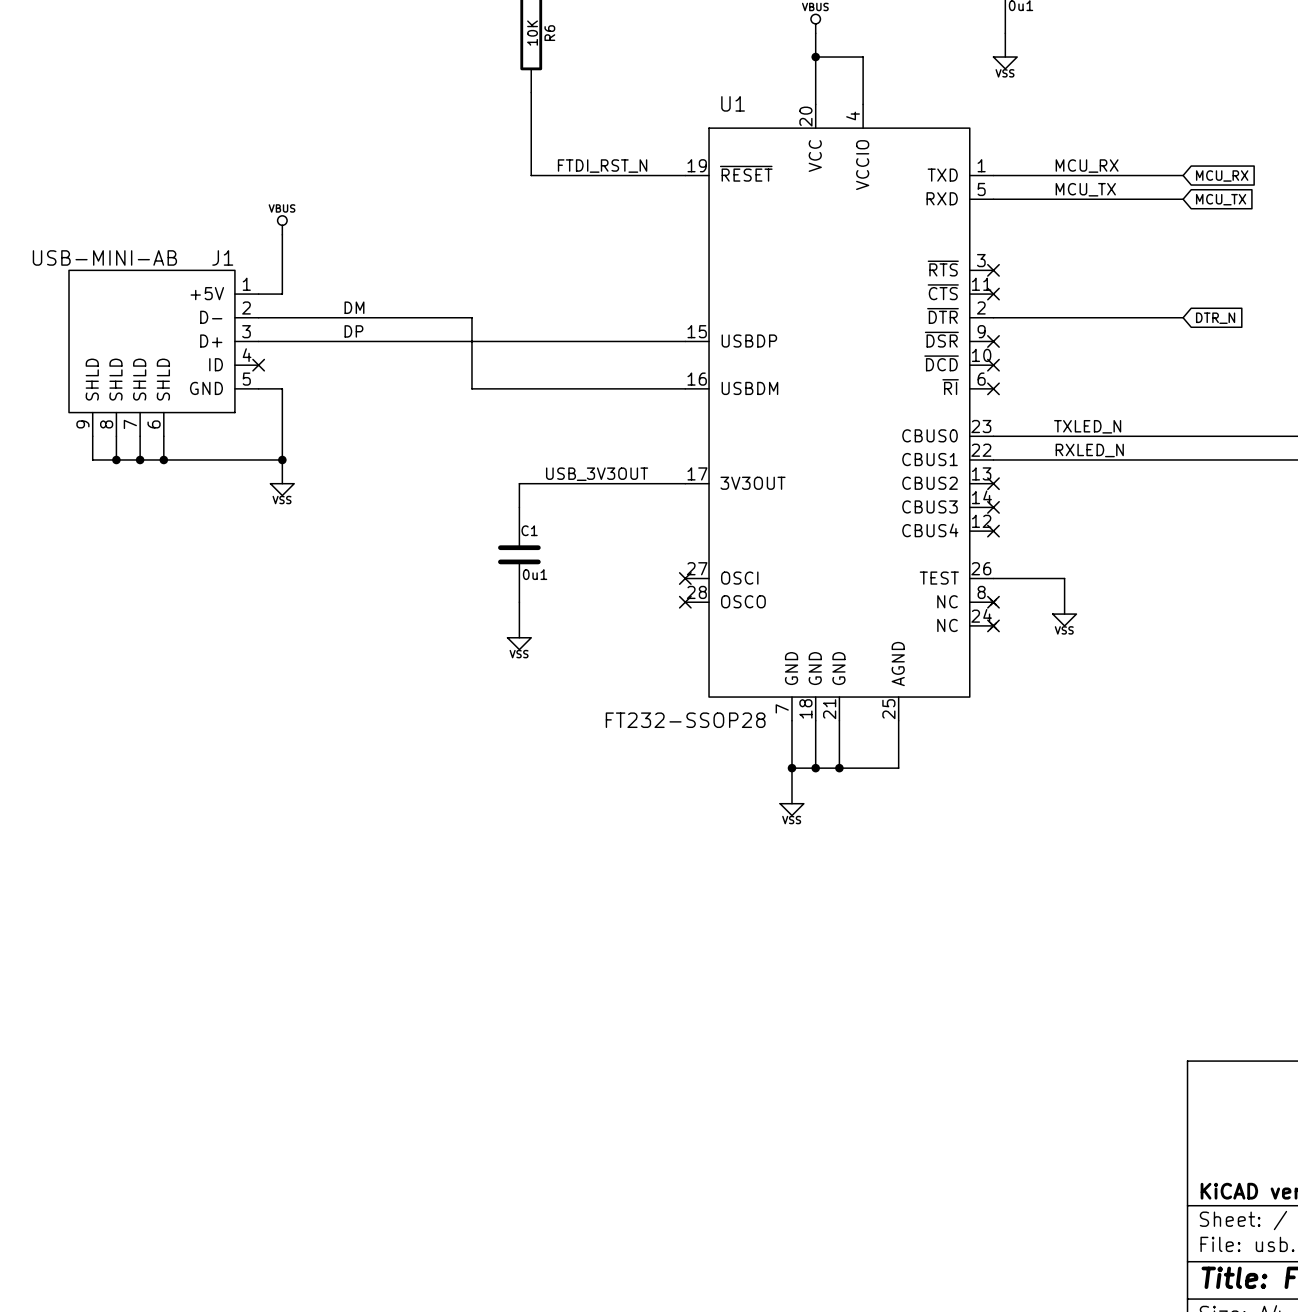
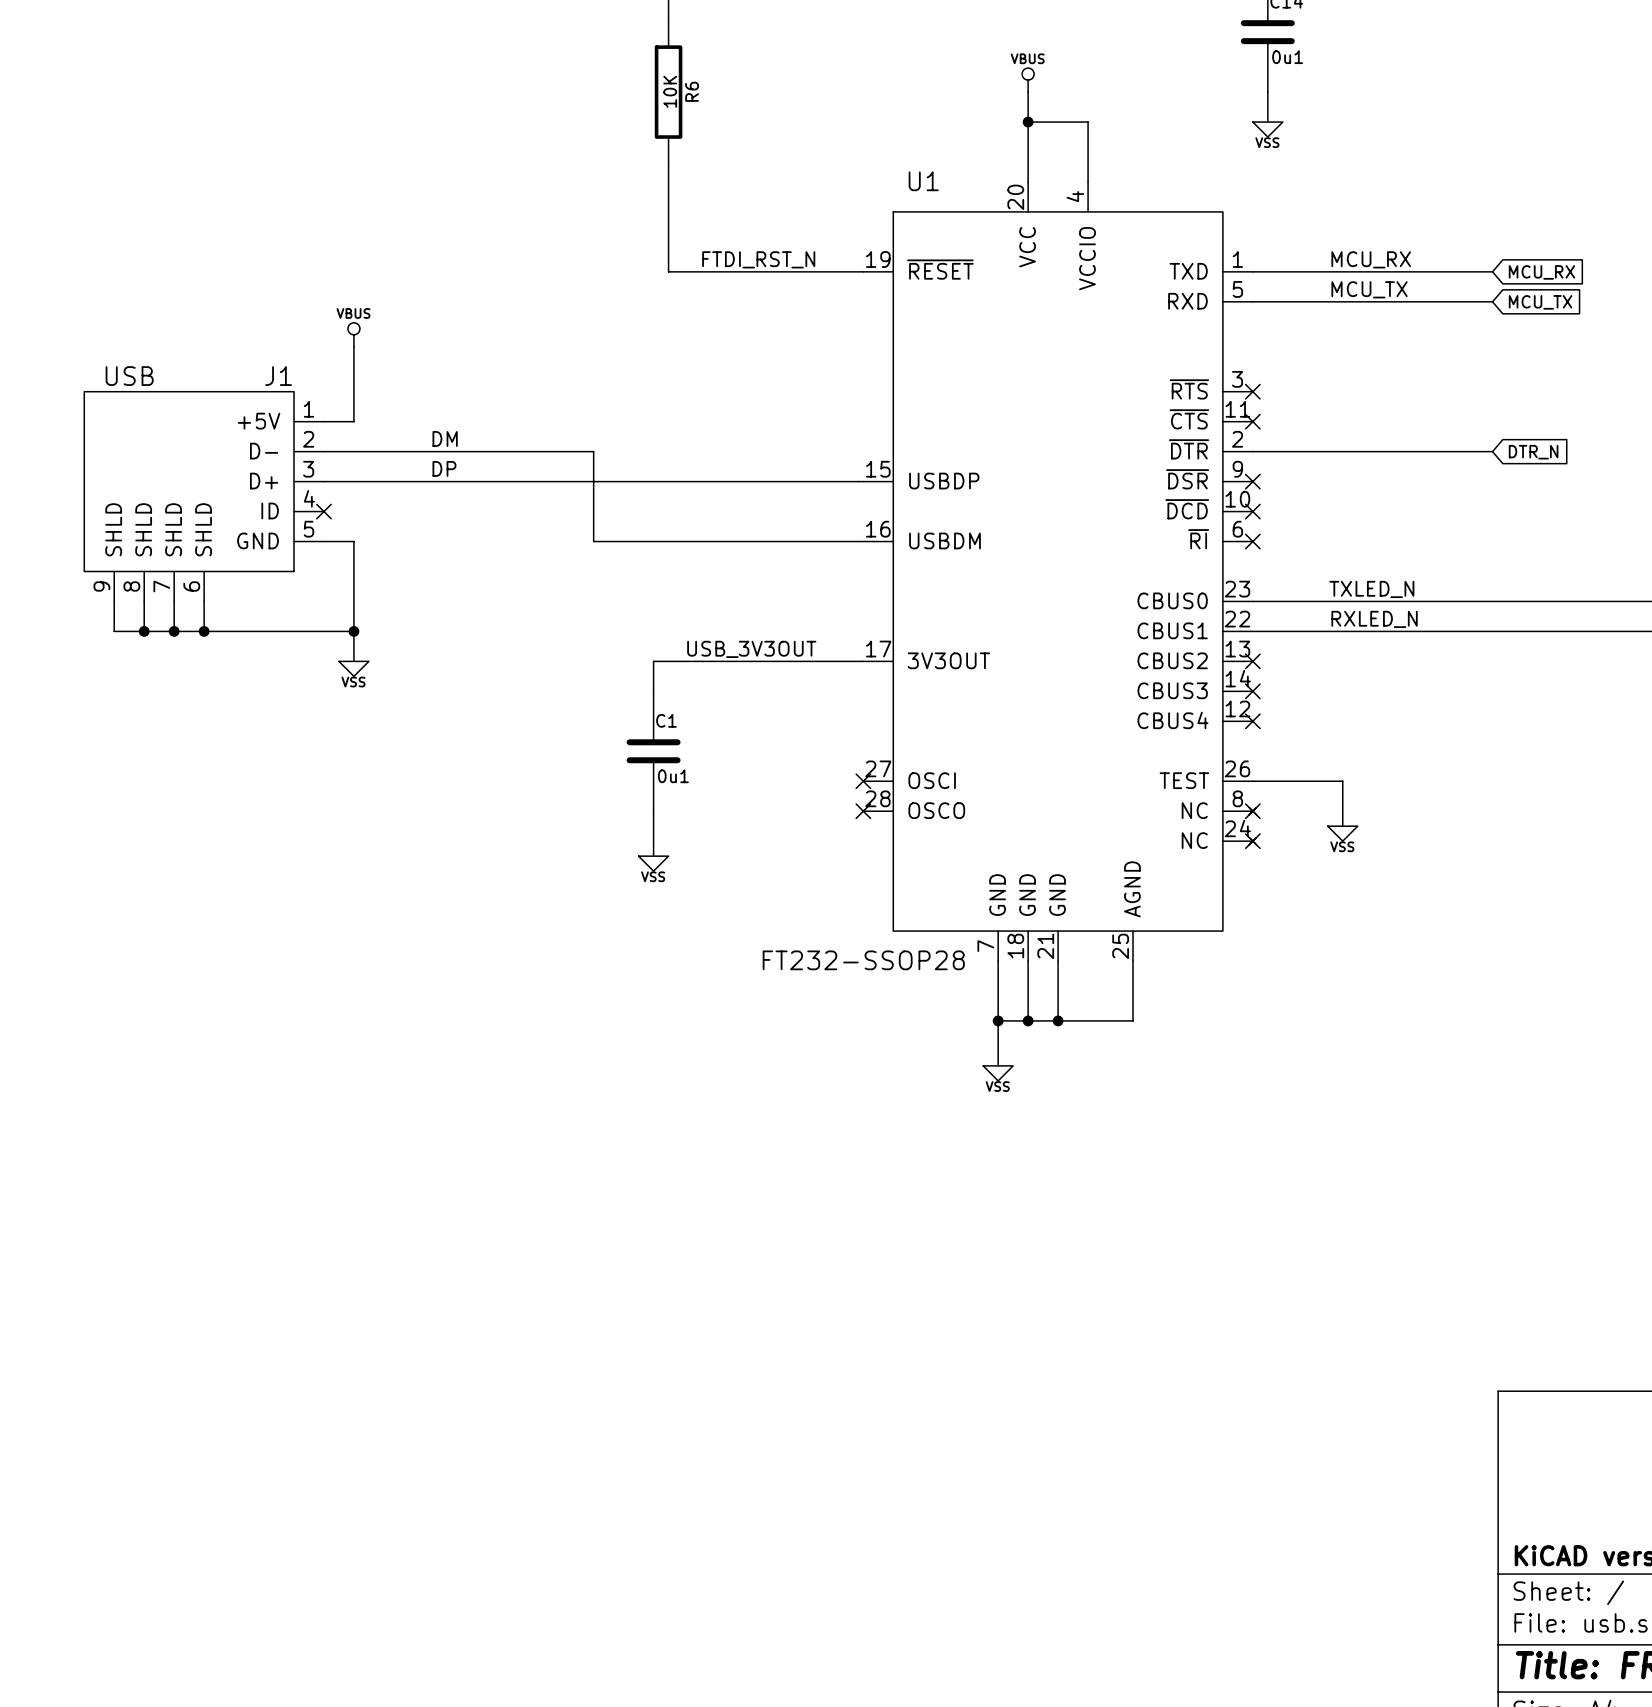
J1 value: USB-MINI-AB (104, 257) -> USB (129, 376)

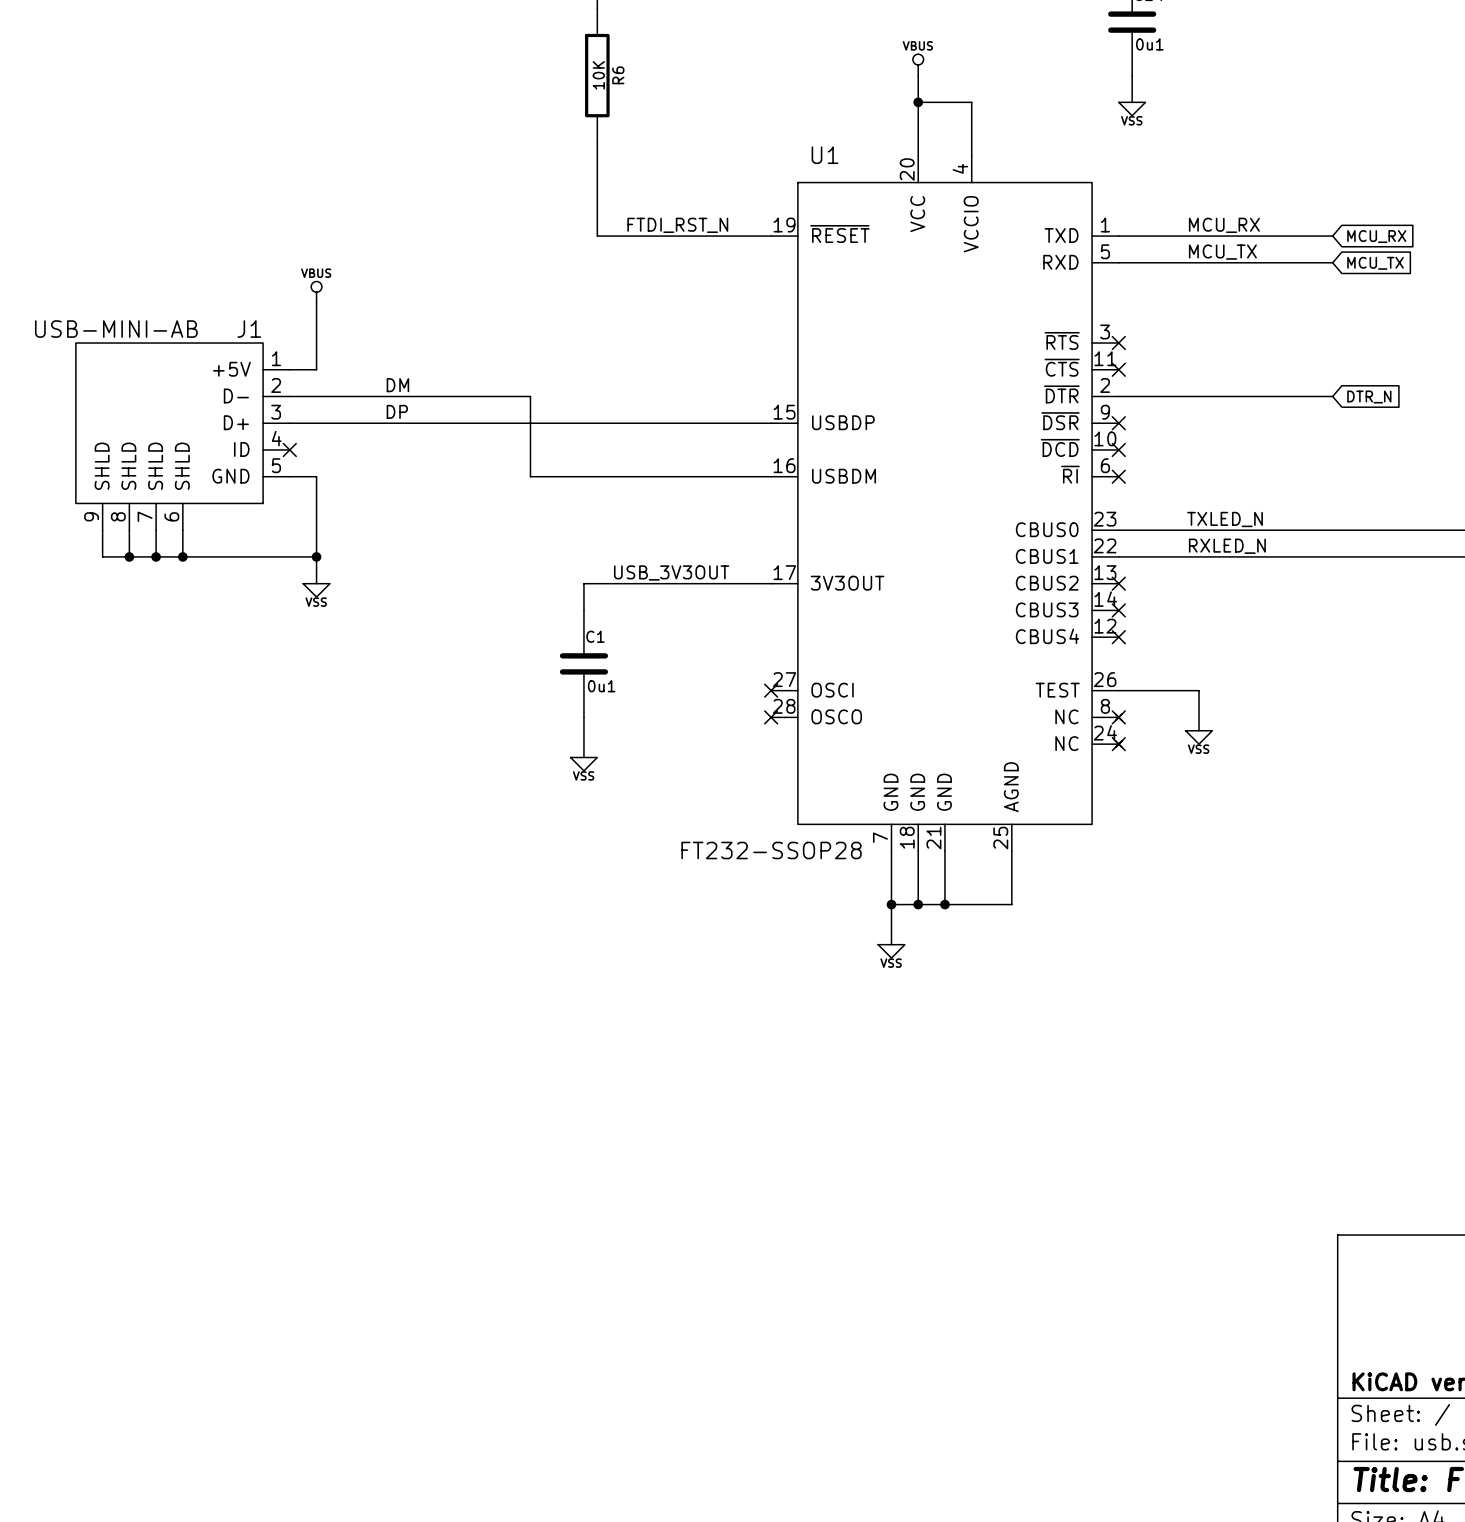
J1 value: USB (129, 376) -> USB-MINI-AB (116, 329)

